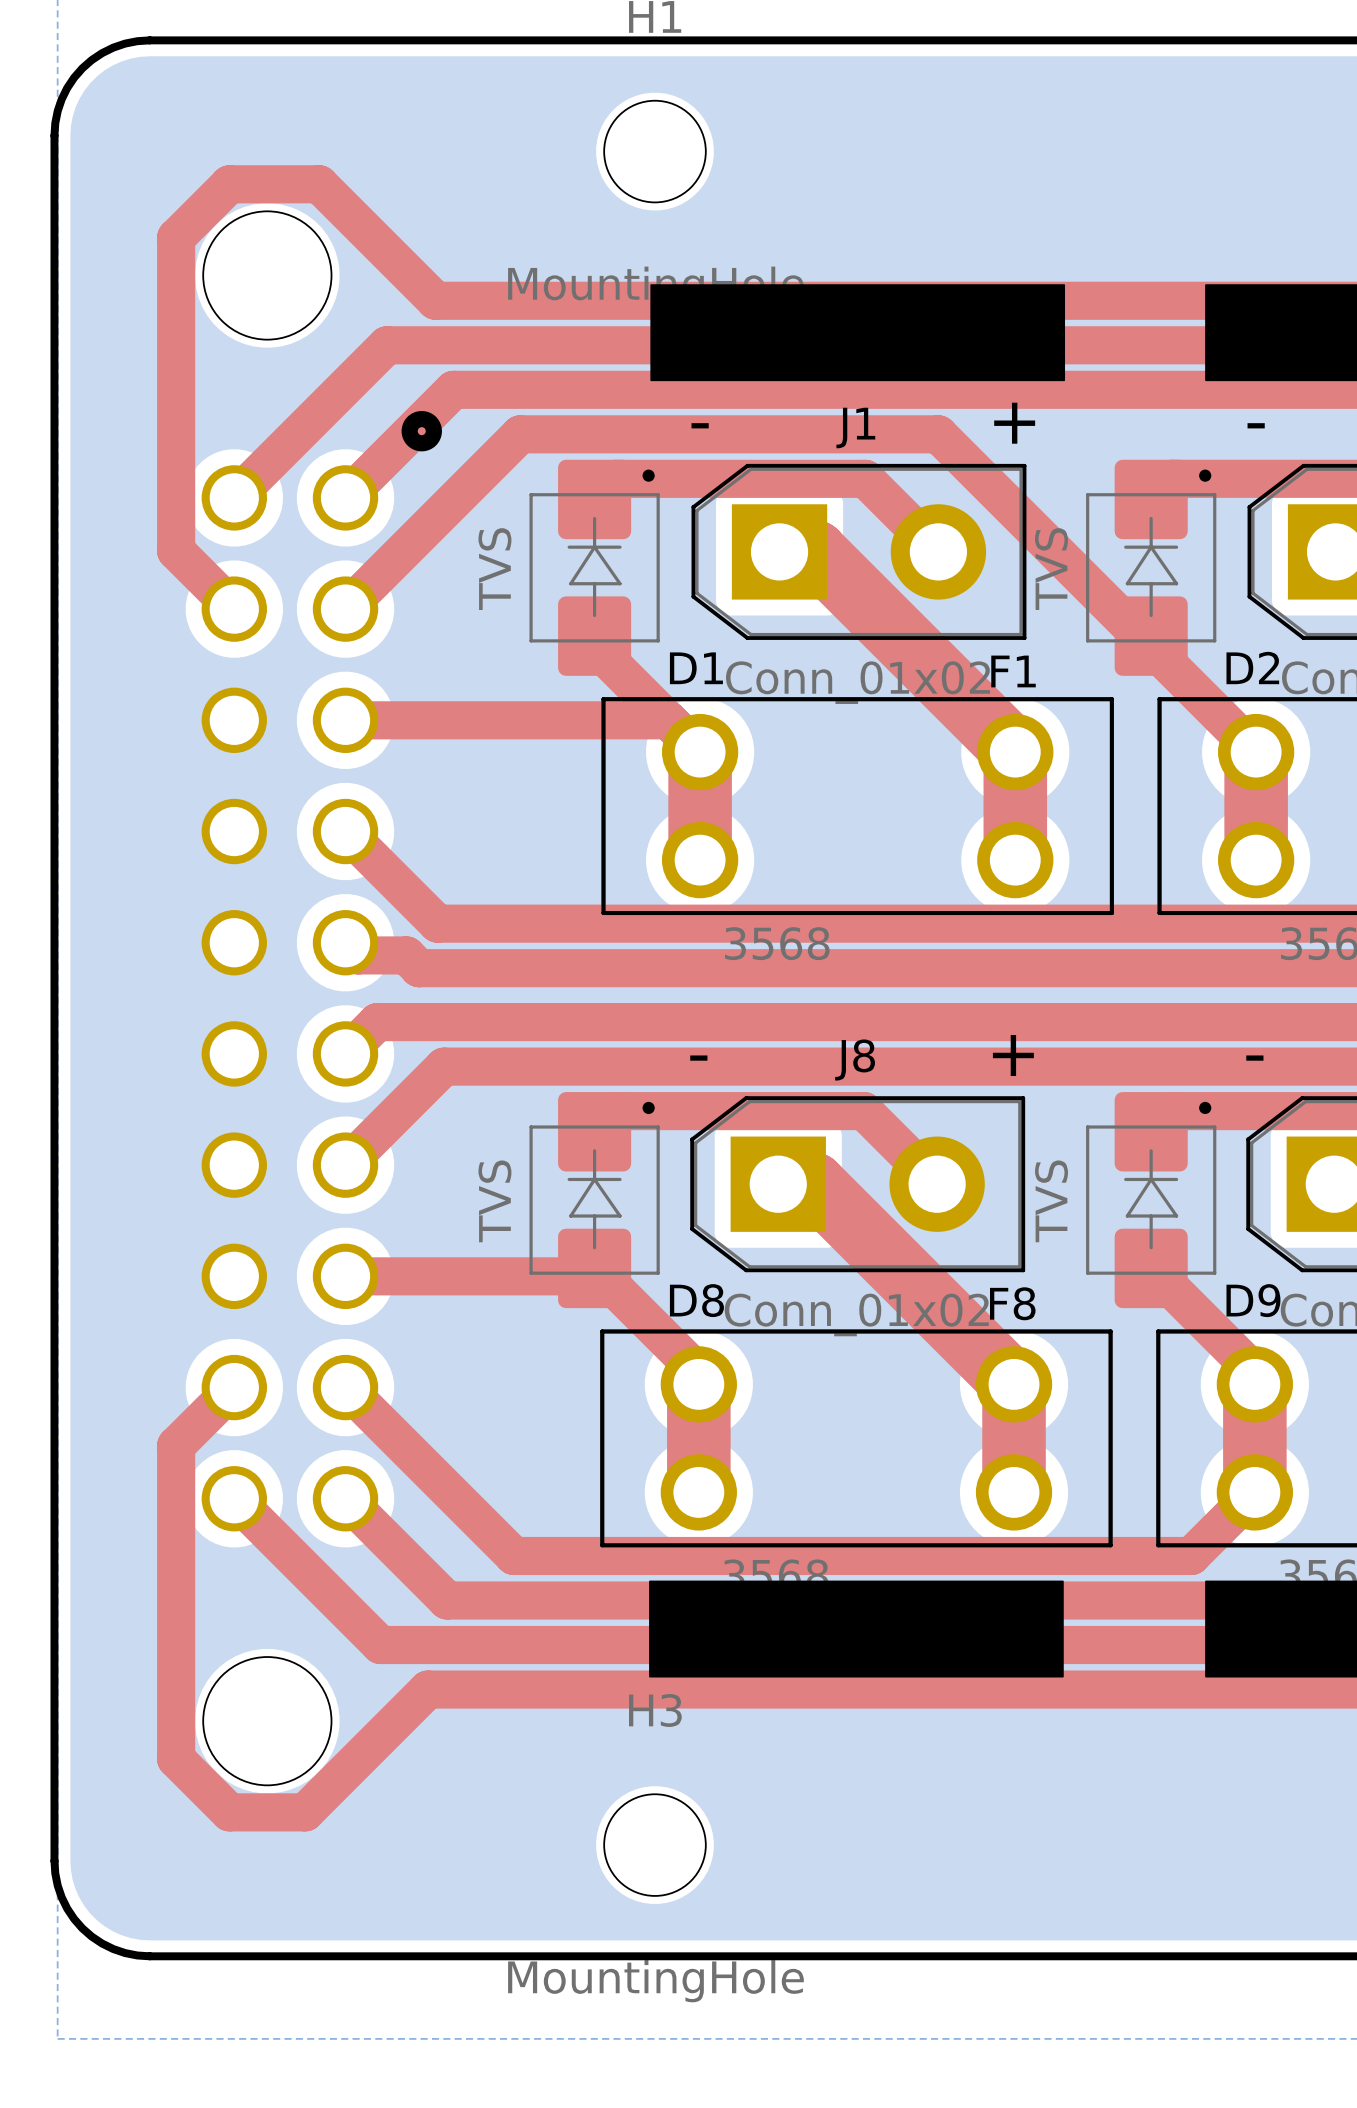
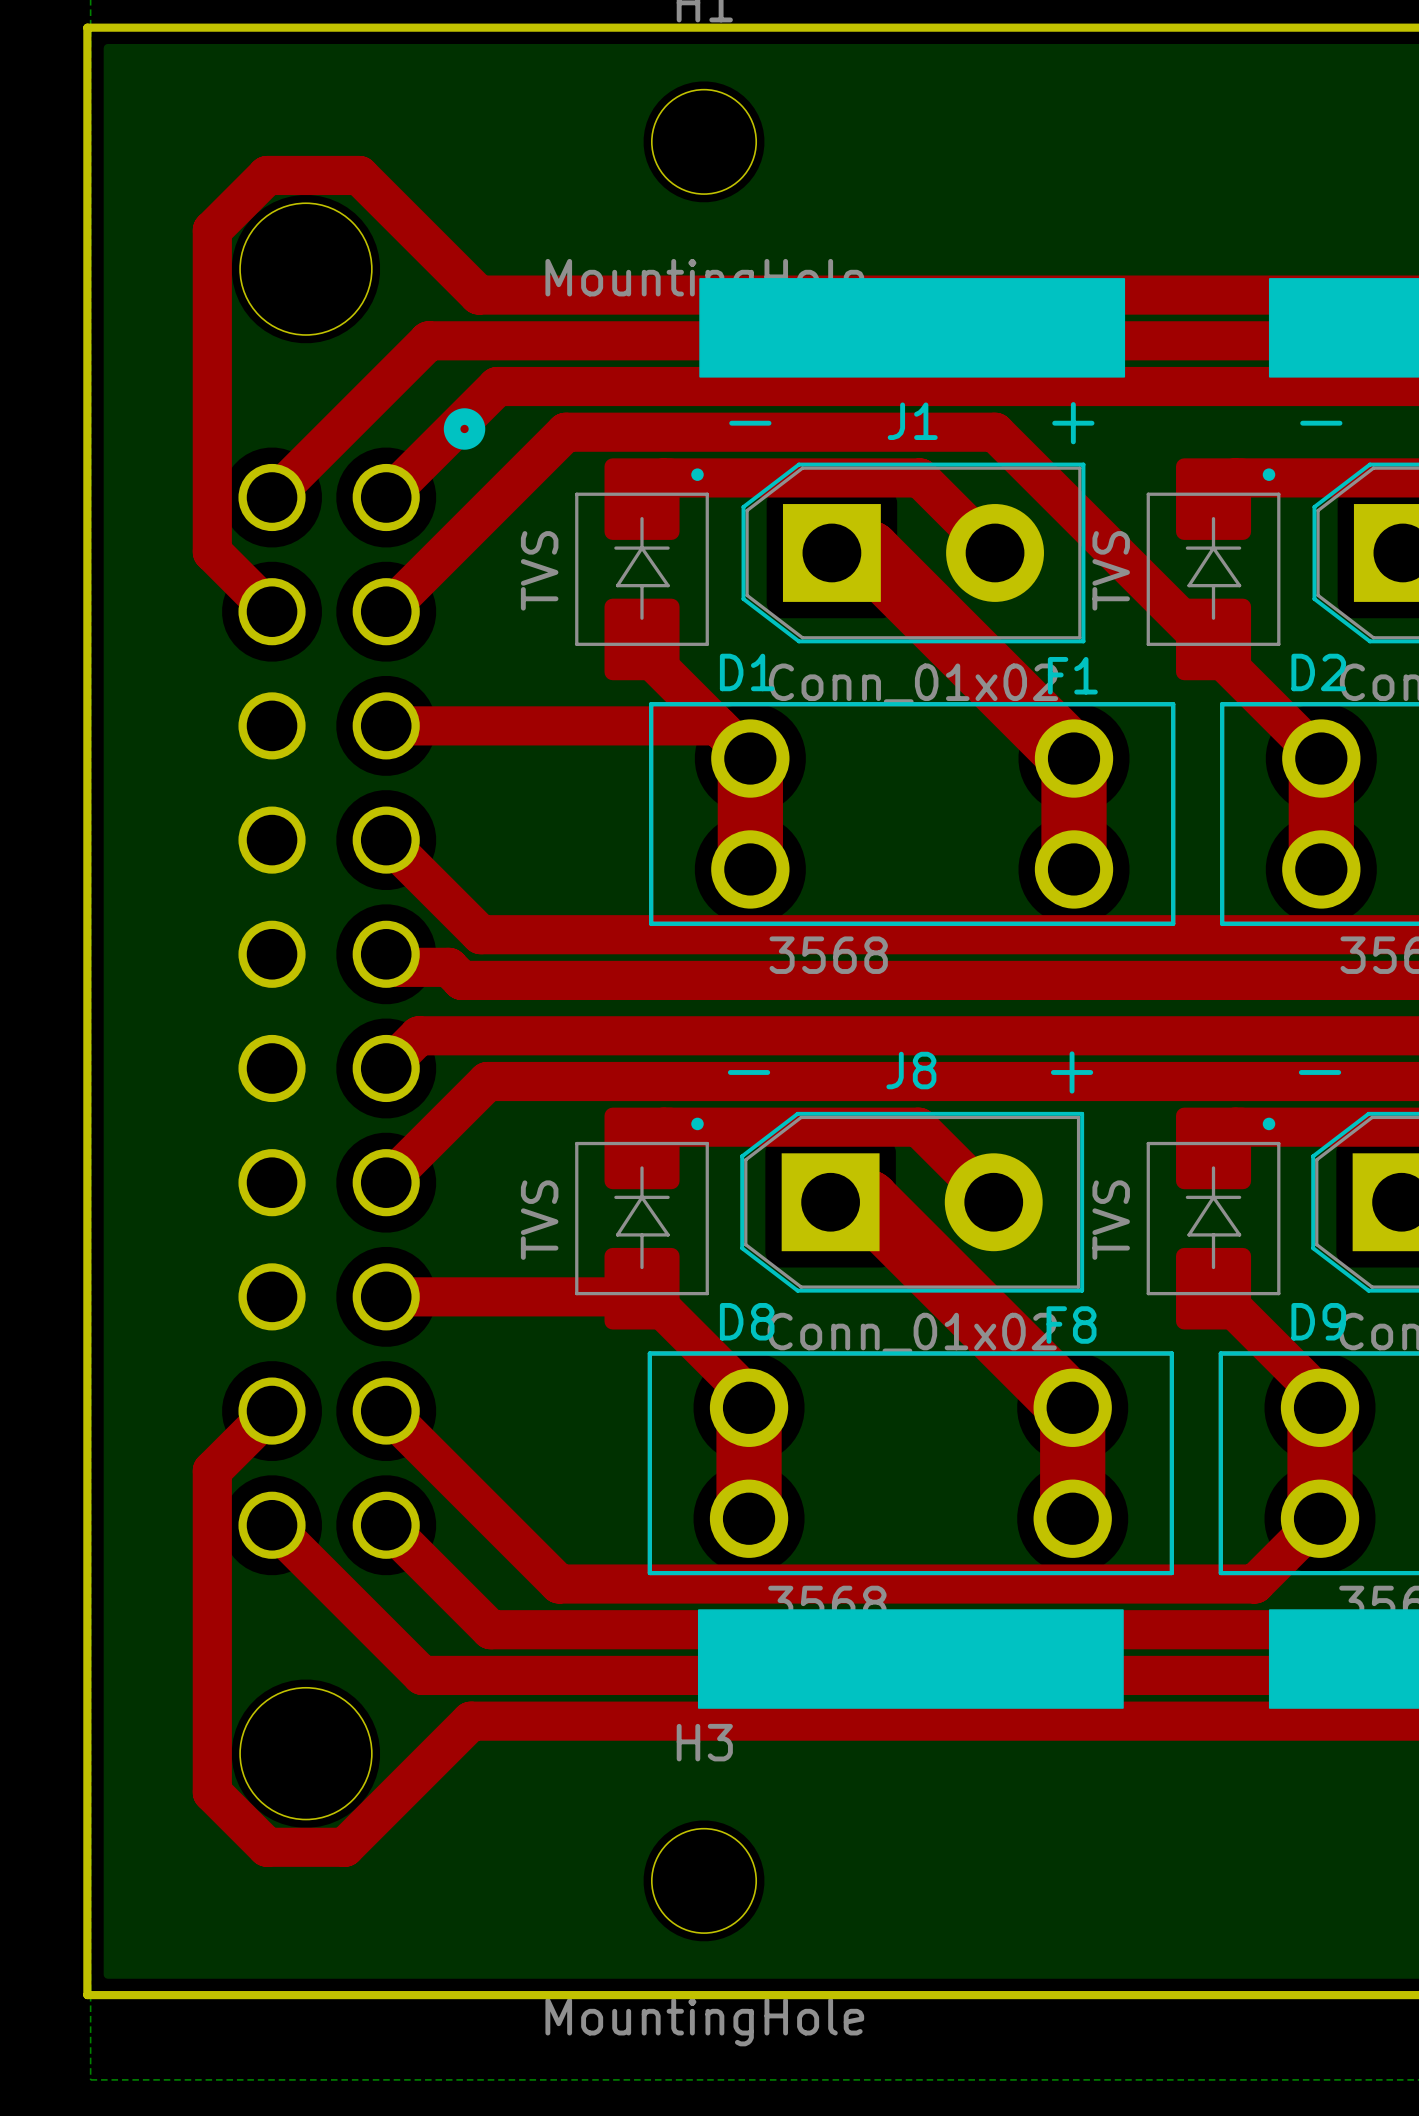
board edge: (149, 40) (125, 43) (113, 47) (91, 60) (82, 68) (67, 88) (61, 99) (55, 123) (54, 135) -> (185, 27) (87, 27) (87, 125)
board edge: (54, 1860) (55, 1873) (61, 1897) (67, 1908) (82, 1928) (102, 1943) (113, 1949) (125, 1953) (149, 1956) -> (87, 1897) (87, 1995) (185, 1995)

